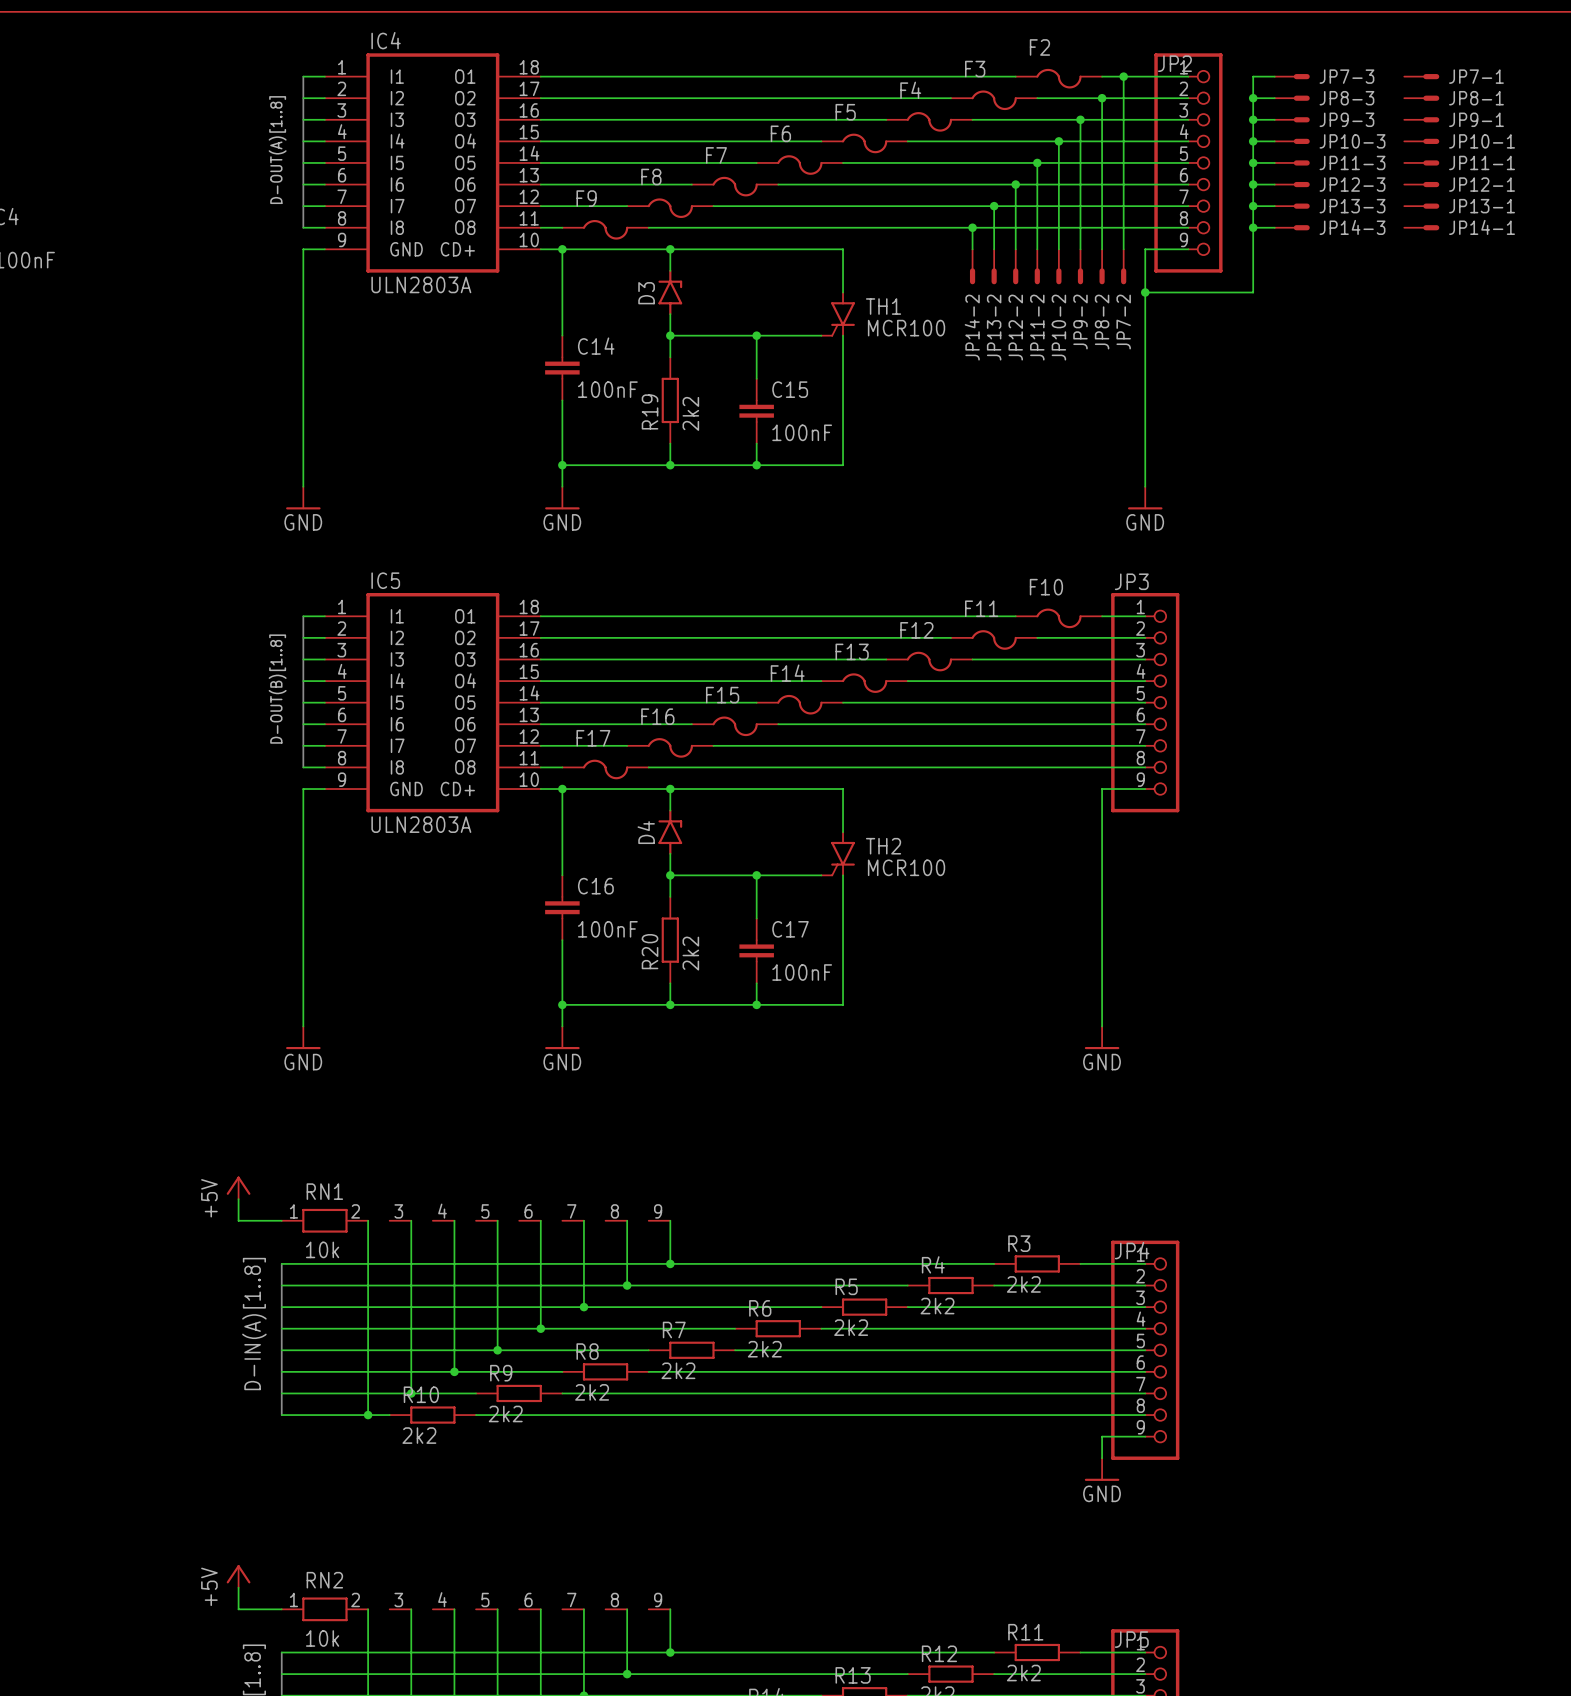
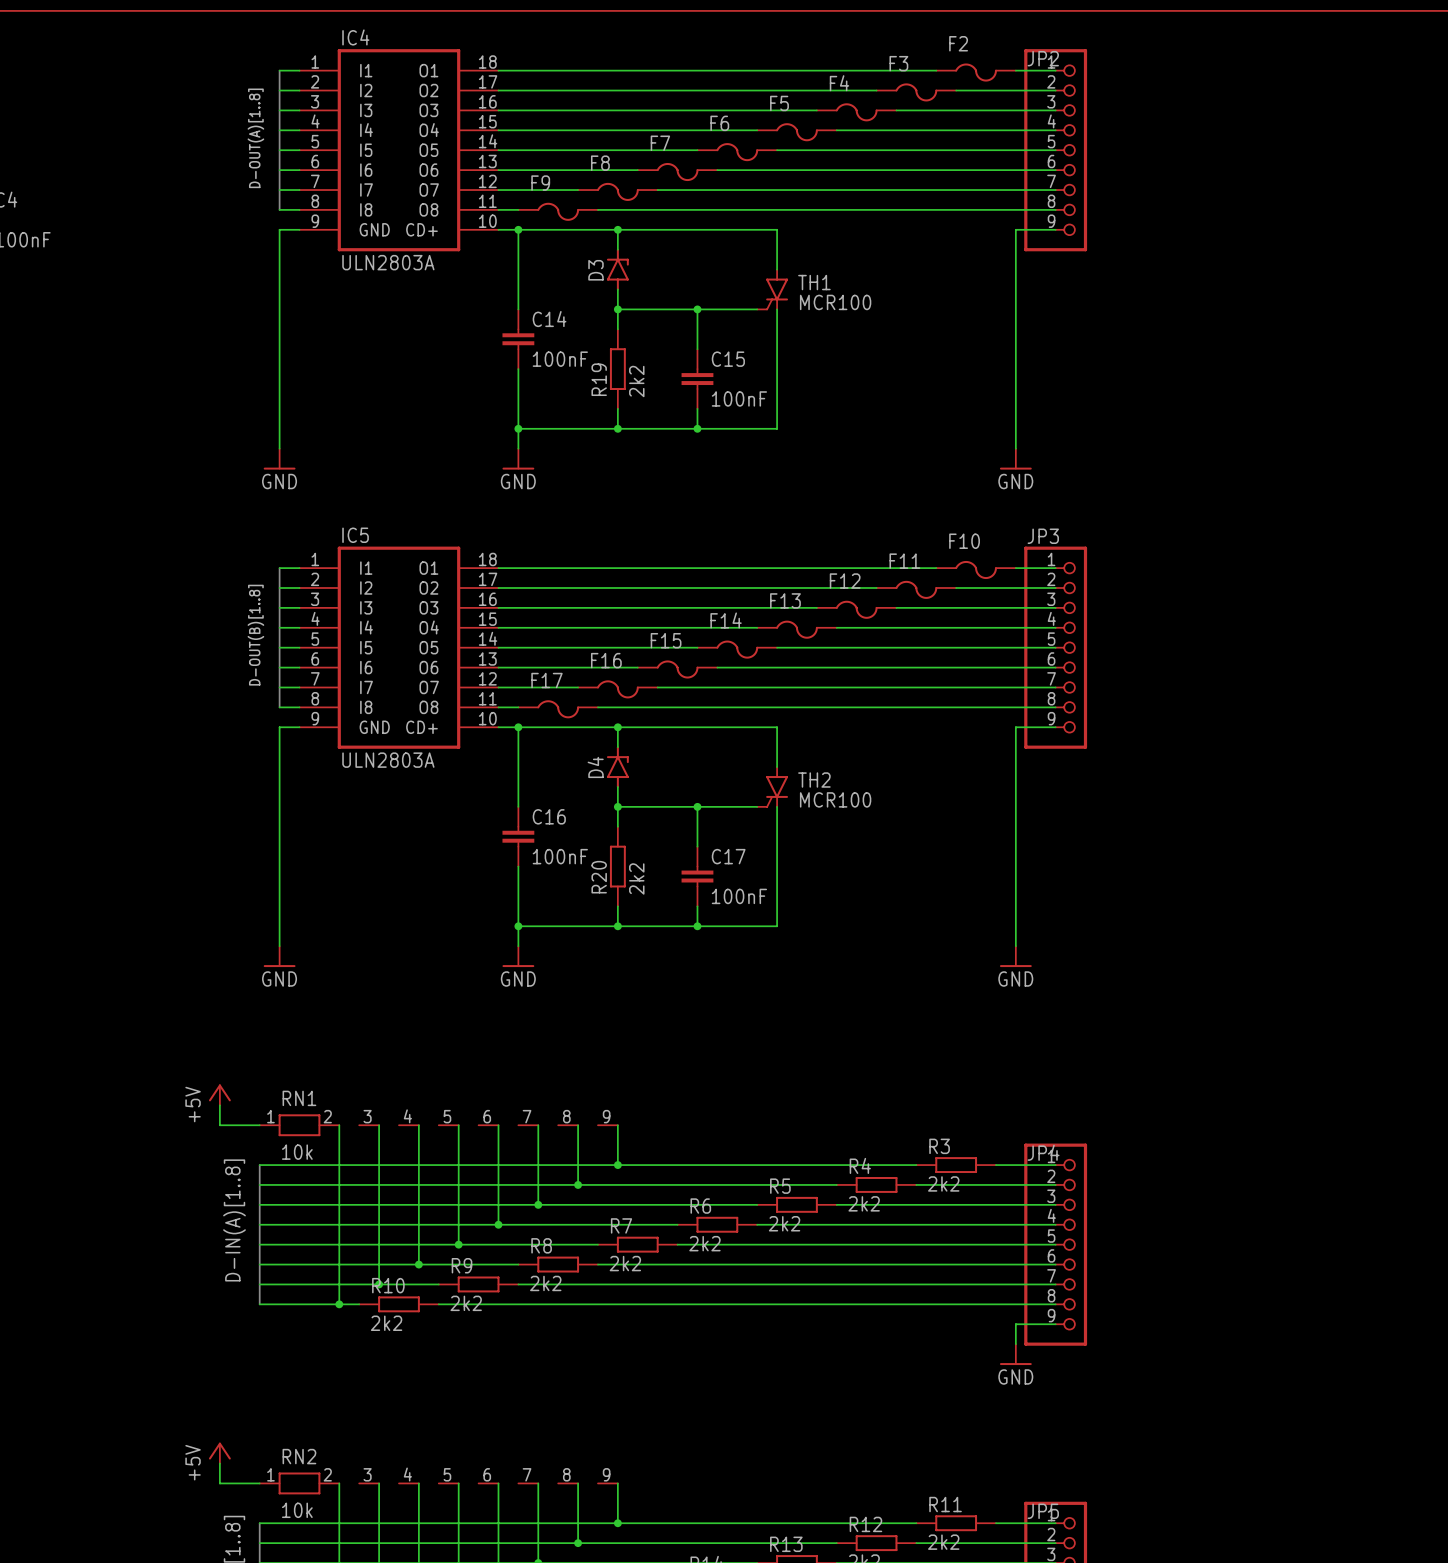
wire: (1123, 76) (1123, 249) -> none
junction: (1123, 76) -> none
wire: (1145, 76) (1188, 76) -> none
wire: (1274, 76) (1253, 76) (1253, 292) (1145, 292) -> none
JP7-3: (1292, 76) -> none
JP7-1: (1421, 76) -> none
wire: (1102, 98) (1102, 249) -> none
junction: (1102, 98) -> none
wire: (1145, 98) (1188, 98) -> none
wire: (1253, 98) (1274, 98) -> none
junction: (1253, 98) -> none
JP8-3: (1292, 98) -> none
JP8-1: (1421, 98) -> none
wire: (1080, 119) (1080, 249) -> none
junction: (1080, 119) -> none
wire: (1145, 119) (1188, 119) -> none
wire: (1253, 119) (1274, 119) -> none
junction: (1253, 119) -> none
JP9-3: (1292, 119) -> none
JP9-1: (1421, 119) -> none
wire: (1058, 141) (1058, 249) -> none
junction: (1058, 141) -> none
wire: (1145, 141) (1188, 141) -> none
wire: (1253, 141) (1274, 141) -> none
junction: (1253, 141) -> none
JP10-3: (1292, 141) -> none
JP10-1: (1421, 141) -> none
wire: (1037, 162) (1037, 249) -> none
junction: (1037, 162) -> none
wire: (1145, 162) (1188, 162) -> none
JP2 position: (1188, 162) -> (1055, 150)
wire: (1253, 162) (1274, 162) -> none
junction: (1253, 162) -> none
JP11-3: (1292, 162) -> none
JP11-1: (1421, 162) -> none
wire: (1015, 184) (1015, 249) -> none
junction: (1015, 184) -> none
wire: (1145, 184) (1188, 184) -> none
wire: (1253, 184) (1274, 184) -> none
junction: (1253, 184) -> none
JP12-3: (1292, 184) -> none
JP12-1: (1421, 184) -> none
wire: (994, 206) (994, 249) -> none
junction: (994, 206) -> none
wire: (1145, 206) (1188, 206) -> none
wire: (1253, 206) (1274, 206) -> none
junction: (1253, 206) -> none
JP13-3: (1292, 206) -> none
JP13-1: (1421, 206) -> none
wire: (972, 227) (972, 249) -> none
junction: (972, 227) -> none
wire: (1145, 227) (1188, 227) -> none
wire: (1253, 227) (1274, 227) -> none
junction: (1253, 227) -> none
JP14-3: (1292, 227) -> none
JP14-1: (1421, 227) -> none
wire: (1188, 249) (1145, 249) (1145, 486) -> (1055, 229) (1015, 229) (1015, 448)
JP14-2: (972, 266) -> none
JP13-2: (994, 266) -> none
JP12-2: (1015, 266) -> none
JP11-2: (1037, 266) -> none
JP10-2: (1058, 266) -> none
JP9-2: (1080, 266) -> none
JP8-2: (1102, 266) -> none
JP7-2: (1123, 266) -> none
junction: (1145, 292) -> none
power symbol position: GND (1145, 498) -> GND (1015, 459)

